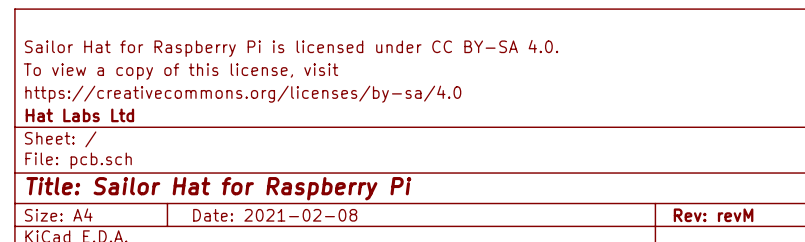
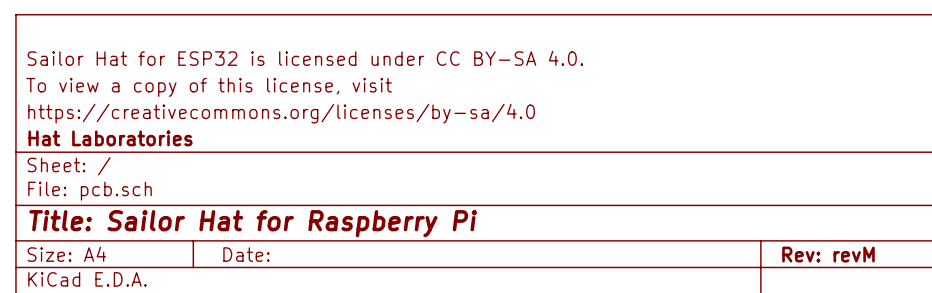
title block: Sailor Hat for Raspberry Pi is licensed under CC BY-SA 4.0. (291, 48) -> Sailor Hat for ESP32 is licensed under CC BY-SA 4.0. (305, 58)
title block: Hat Labs Ltd (79, 115) -> Hat Laboratories (110, 138)
title block: Date: 2021-02-08 (275, 215) -> Date: (246, 254)

